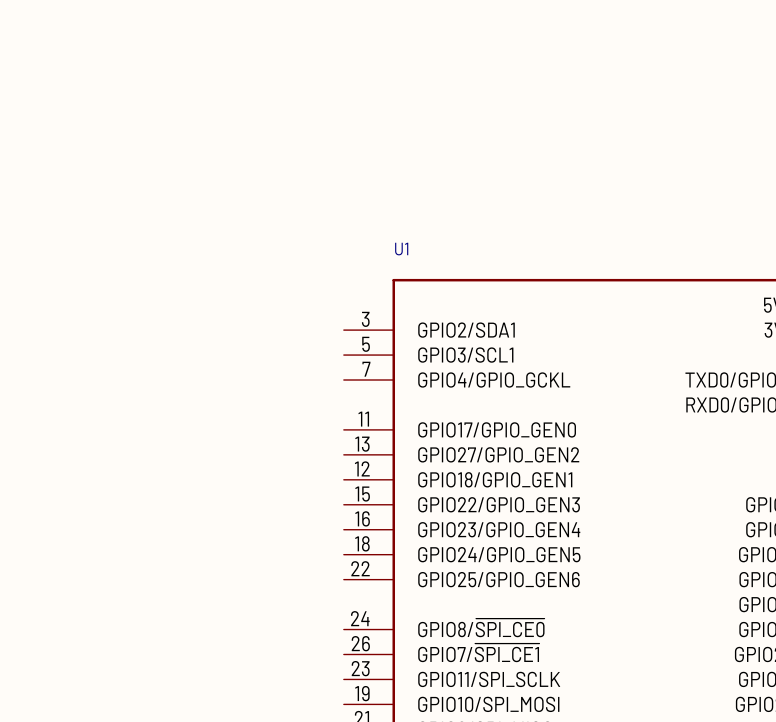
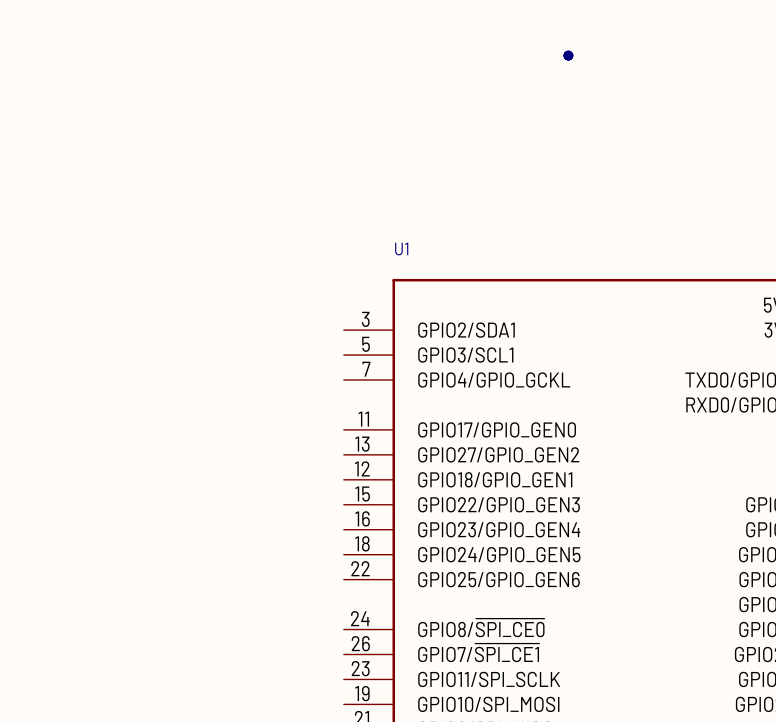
junction: none -> (568, 55)

